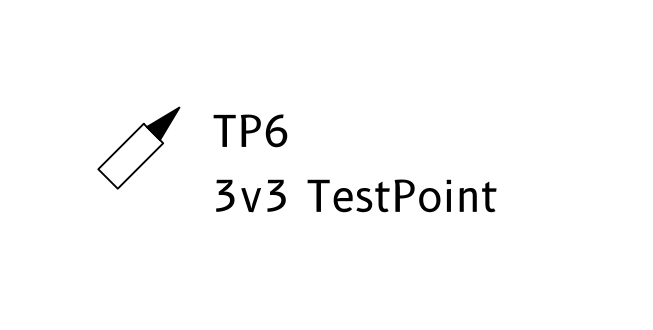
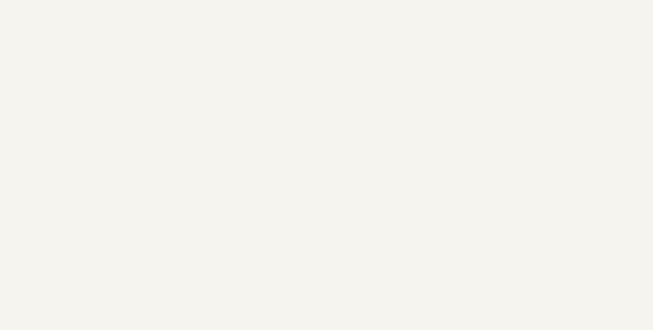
TP6: 3v3 TestPoint (138, 148) -> none

